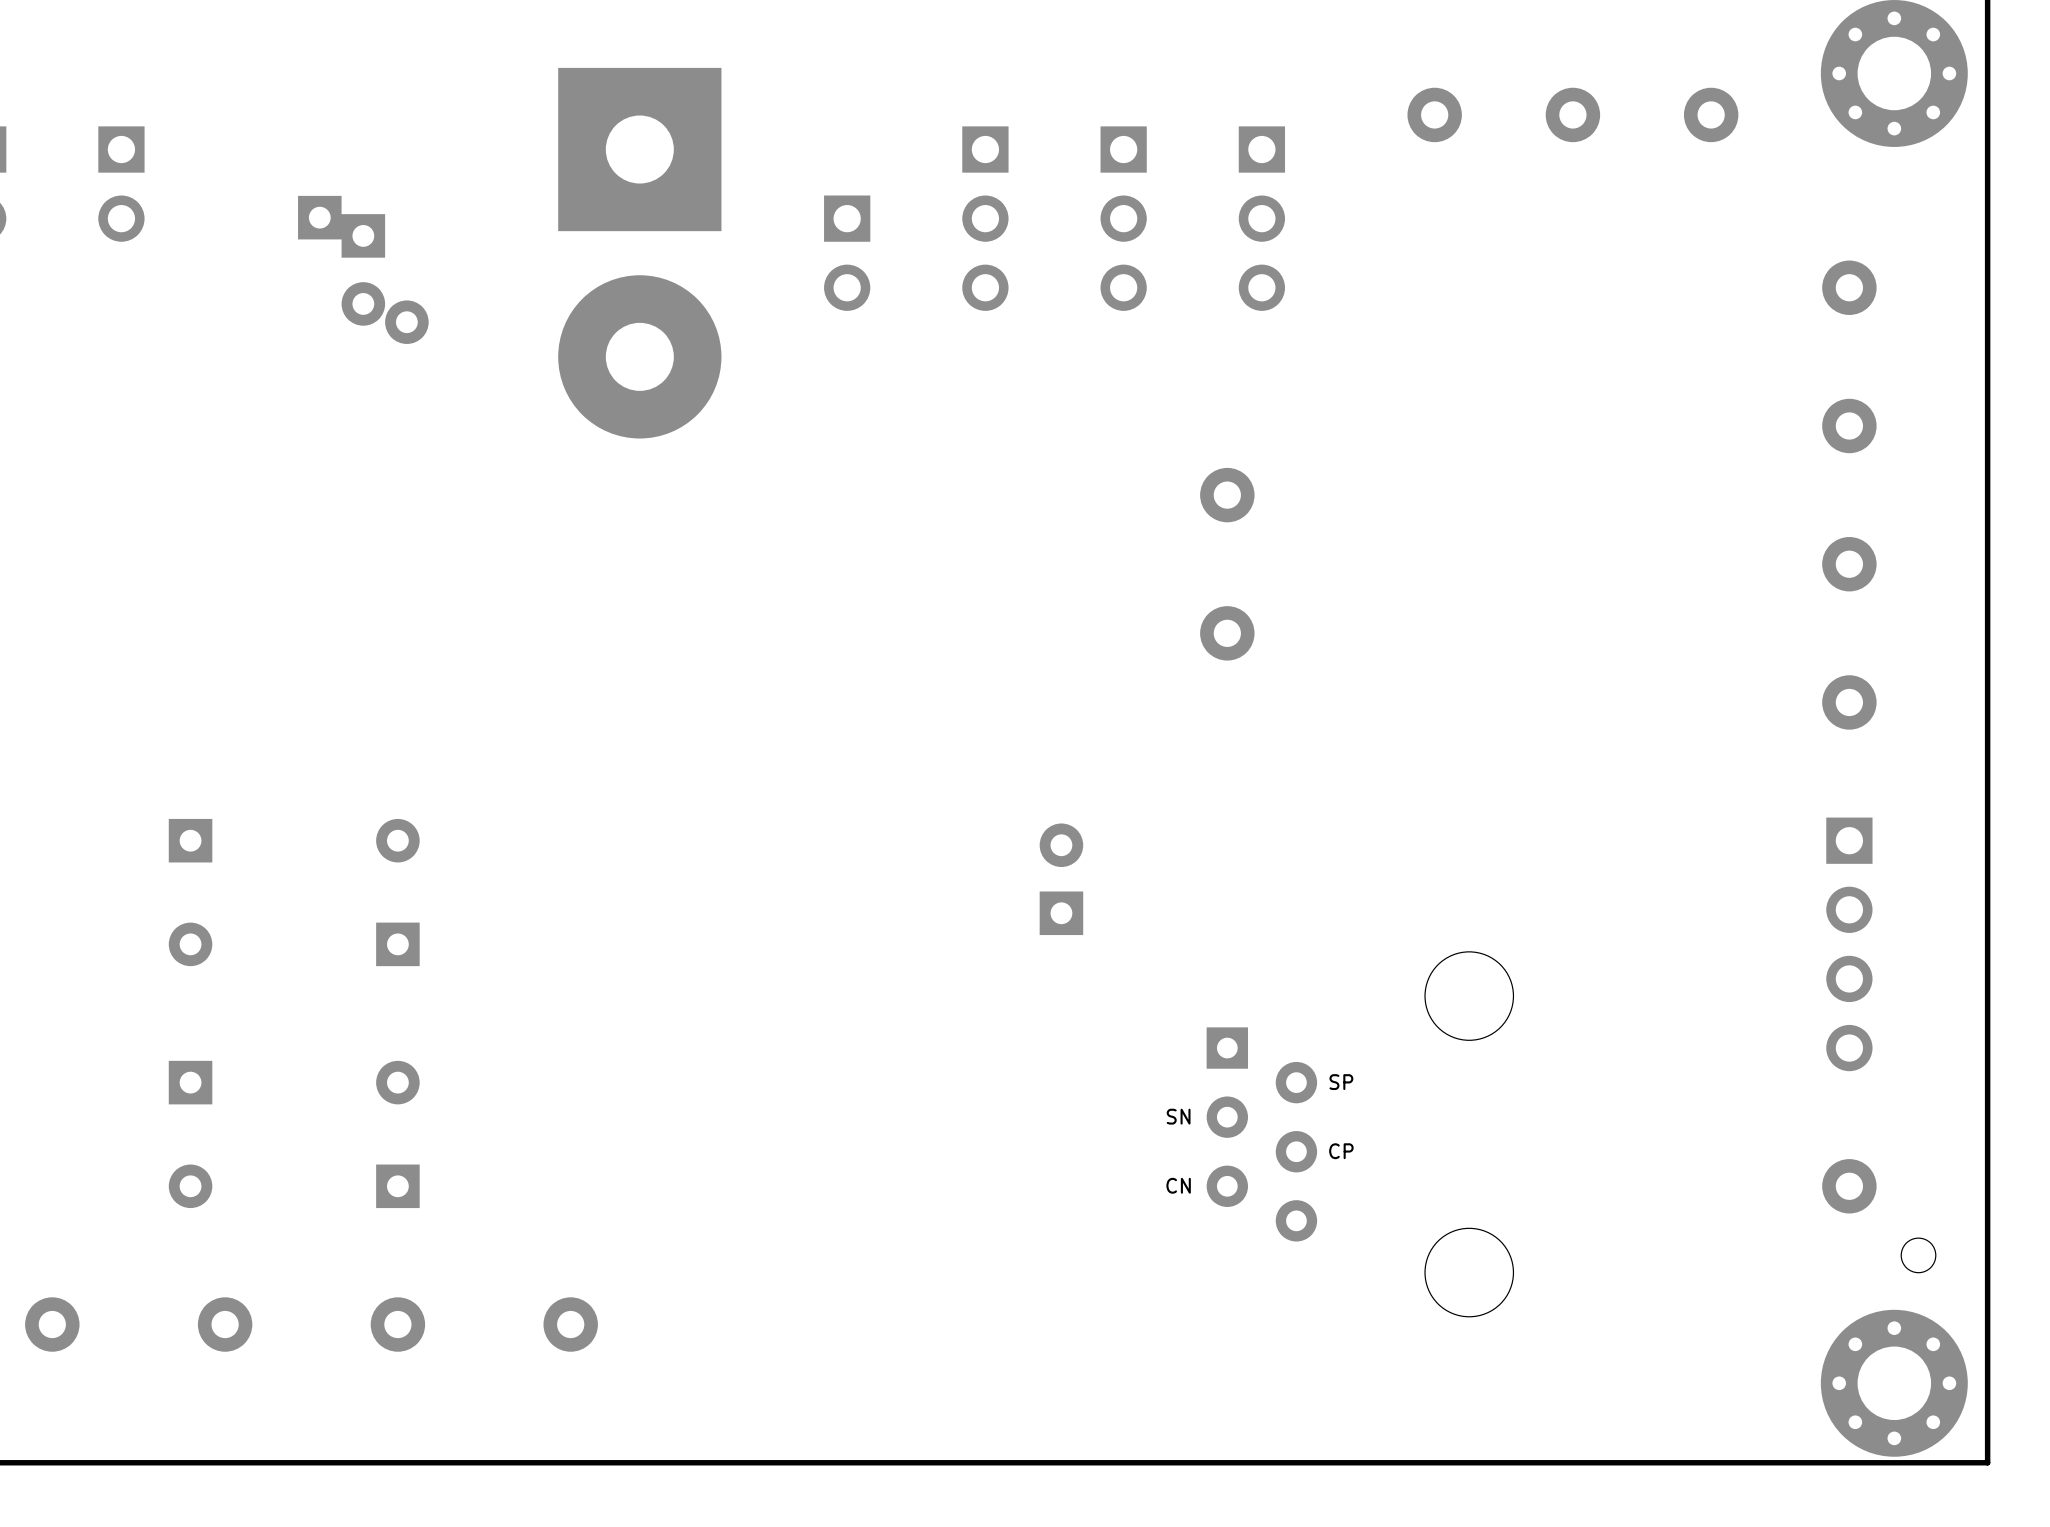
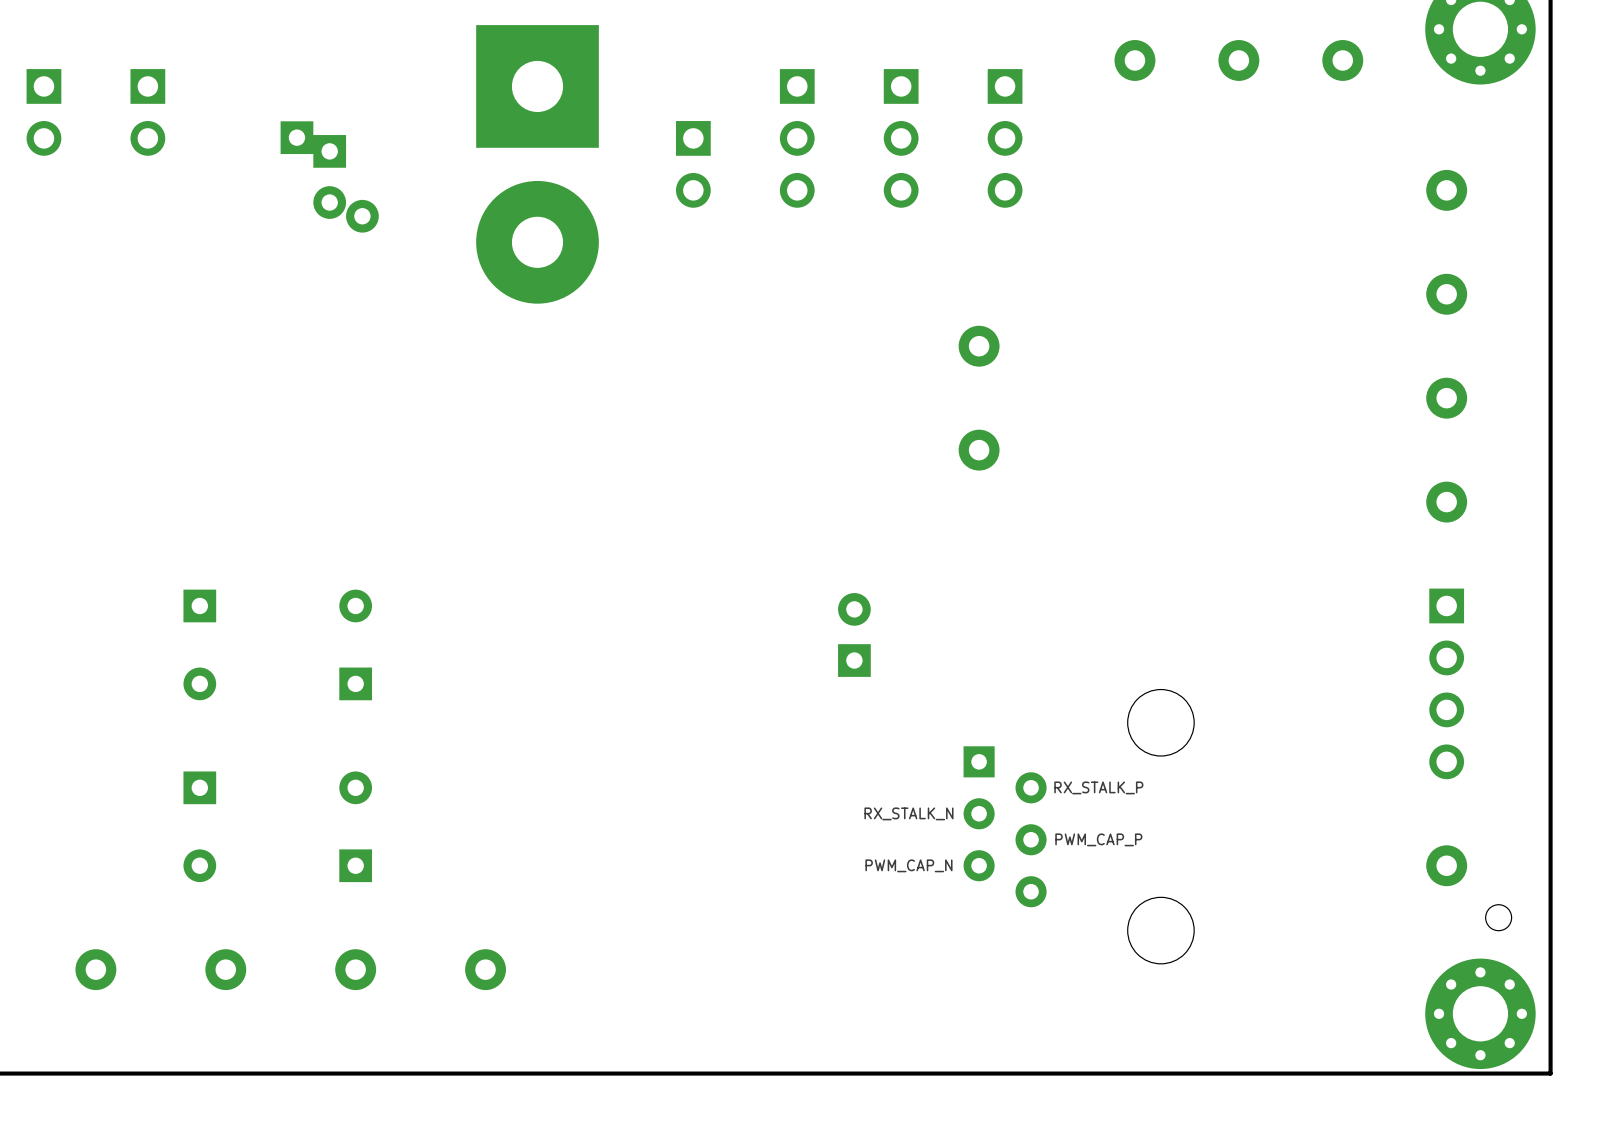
text: SP (1341, 1082) -> none
text: none -> RX_STALK_P (1098, 787)
text: SN (1178, 1116) -> none
text: none -> RX_STALK_N (908, 813)
text: CP (1341, 1151) -> none
text: none -> PWM_CAP_P (1098, 839)
text: CN (1178, 1185) -> none
text: none -> PWM_CAP_N (908, 865)

